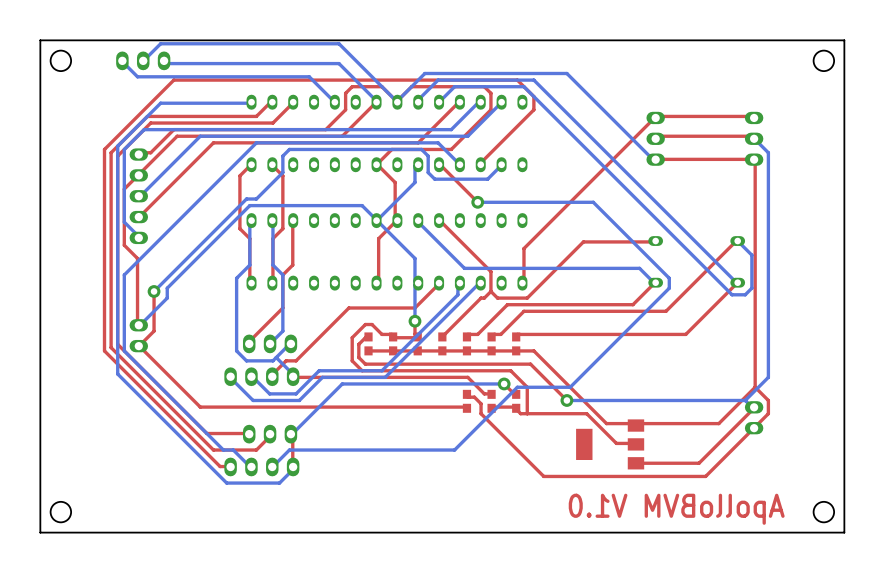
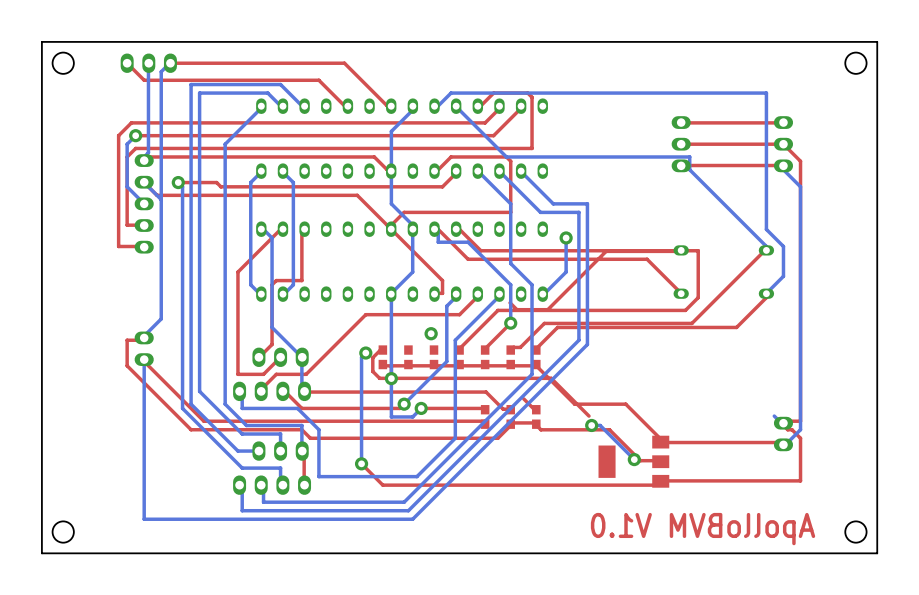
top track: none -> (127, 63) (144, 80) (318, 80) (344, 105) (347, 106)
bottom track: (122, 60) (137, 76) (309, 76) (334, 102) -> none
bottom track: (143, 60) (160, 43) (339, 43) (397, 102) (424, 73) (566, 73) (652, 159) (655, 159) -> (148, 63) (148, 152) (144, 156) (144, 160)
bottom track: (164, 60) (167, 63) (339, 63) (376, 102) -> none
bottom track: (251, 102) (160, 103) (117, 146) (117, 374) (226, 483) (279, 483) (292, 469) (293, 466) -> (261, 106) (225, 144) (225, 404) (246, 425) (301, 425) (302, 451)
top track: (272, 102) (256, 116) (147, 116) (111, 152) (111, 347) (213, 450) (256, 450) (270, 434) -> none
bottom track: none -> (282, 106) (267, 93) (199, 93) (199, 391) (242, 434) (280, 434) (280, 451)
top track: (293, 102) (272, 123) (150, 123) (117, 156) (117, 344) (206, 433) (249, 434) -> none
bottom track: none -> (304, 106) (301, 105) (280, 84) (191, 84) (191, 404) (237, 451) (258, 451)
top track: (376, 102) (342, 136) (177, 136) (124, 189) (124, 245) (137, 258) (138, 325) -> (391, 106) (387, 105) (344, 63) (170, 63)
bottom track: none -> (412, 106) (412, 110) (391, 131) (391, 203) (412, 225) (412, 229) (412, 272) (391, 294) (391, 416) (412, 416) (421, 408)
bottom track: (418, 102) (438, 80) (533, 80) (737, 282) -> (434, 106) (438, 105) (451, 93) (766, 93) (766, 229) (783, 246) (783, 276) (766, 293)
bottom track: (439, 102) (454, 86) (523, 86) (732, 294) (745, 294) (751, 288) (751, 255) (737, 241) -> (456, 106) (506, 156) (689, 156) (689, 169) (766, 246) (766, 250)
top track: (459, 102) (418, 142) (213, 142) (138, 217) -> (477, 106) (480, 105) (493, 93) (527, 93) (532, 97) (532, 148) (135, 148) (127, 156) (127, 225) (144, 225)
top track: none -> (499, 106) (485, 122) (131, 122) (118, 135) (118, 246) (144, 247)
bottom track: (480, 102) (451, 129) (144, 129) (124, 149) (124, 222) (138, 237) -> none
top track: none -> (521, 106) (493, 135) (135, 135)
bottom track: (501, 102) (467, 136) (200, 136) (138, 196) -> (135, 135) (127, 144) (127, 186) (144, 203)
top track: (754, 117) (656, 116) (523, 248) (522, 283) -> (783, 122) (681, 122)
via: none -> (135, 135)
top track: (754, 138) (751, 136) (656, 136) (655, 138) -> (361, 463) (382, 485) (659, 485) (660, 481) (664, 480) (800, 480) (800, 438) (792, 429) (787, 429) (783, 425) (783, 421) (800, 421) (800, 161) (783, 144) (681, 144)
bottom track: (754, 138) (768, 152) (768, 377) (745, 400) (566, 400) -> none
top track: (138, 154) (150, 152) (173, 129) (325, 129) (345, 109) (345, 93) (352, 86) (381, 86) (397, 102) (411, 86) (484, 86) (490, 93) (490, 109) (451, 149) (391, 149) (376, 164) (395, 182) (395, 218) (397, 220) (378, 238) (378, 281) (376, 283) -> (144, 160) (144, 156) (374, 156) (387, 169) (391, 171)
top track: (655, 159) (754, 159) (755, 387) -> (681, 165) (783, 165)
bottom track: none -> (783, 165) (783, 169) (800, 186) (800, 429) (783, 446) (783, 444)
top track: (251, 164) (239, 175) (239, 228) (249, 238) (249, 281) (251, 283) -> none
bottom track: none -> (261, 171) (250, 182) (250, 284) (261, 294)
top track: (272, 164) (282, 175) (282, 228) (272, 238) (272, 283) -> none
bottom track: none -> (282, 171) (293, 182) (293, 284) (282, 294)
top track: none -> (434, 171) (451, 156) (506, 156) (510, 161) (510, 212) (404, 212) (391, 225) (391, 229)
bottom track: (418, 164) (414, 165) (414, 182) (376, 220) -> none
top track: (439, 164) (477, 202) -> (456, 171) (442, 186) (220, 186) (216, 182) (178, 182)
bottom track: (459, 164) (438, 142) (256, 142) (124, 274) (124, 350) (223, 450) (233, 450) (251, 466) -> (477, 171) (510, 203) (510, 263) (532, 284) (532, 374) (404, 502) (263, 502) (263, 485) (261, 485)
top track: (480, 164) (533, 109) (533, 96) (517, 80) (173, 80) (104, 149) (104, 350) (220, 466) (230, 466) -> none
bottom track: none -> (499, 171) (540, 212) (578, 212) (578, 340) (408, 510) (242, 510) (242, 485) (239, 485)
bottom track: (501, 164) (487, 179) (434, 179) (428, 172) (428, 156) (421, 149) (289, 149) (282, 156) (282, 172) (256, 199) (246, 199) (154, 291) -> (521, 171) (553, 203) (587, 203) (587, 344) (412, 519) (144, 519) (144, 359)
top track: none -> (144, 182) (156, 195) (357, 195) (391, 229)
bottom track: none -> (144, 182) (161, 199)
via: none -> (178, 182)
bottom track: (477, 202) (593, 202) (669, 278) (669, 288) (570, 387) (517, 387) (454, 450) (289, 450) (272, 466) -> (178, 182) (182, 186) (182, 408) (242, 468) (280, 468) (280, 485) (282, 485)
via: (477, 202) -> none
bottom track: (251, 220) (249, 222) (249, 265) (236, 278) (236, 350) (246, 360) (272, 360) (290, 343) -> (261, 229) (272, 237) (272, 327) (301, 357) (301, 391) (304, 391)
top track: none -> (282, 229) (237, 272) (237, 374) (263, 374) (280, 357)
bottom track: (272, 220) (272, 265) (282, 274) (282, 331) (270, 343) -> none
top track: (293, 220) (292, 265) (282, 274) (282, 308) (249, 341) (249, 343) -> (304, 229) (301, 229) (301, 280) (276, 280) (272, 284) (272, 344) (258, 357)
top track: none -> (391, 229) (442, 280) (442, 293) (434, 294)
bottom track: (376, 220) (362, 205) (249, 205) (167, 288) (167, 298) (138, 325) -> (170, 63) (161, 71) (161, 318) (144, 337)
bottom track: (376, 220) (414, 258) (414, 281) (418, 283) (414, 284) (414, 321) -> none
bottom track: (418, 220) (464, 268) (639, 268) (655, 282) -> (434, 229) (438, 229) (438, 242) (468, 242) (510, 284) (510, 323)
top track: (439, 220) (490, 271) (490, 291) (484, 298) (481, 298) (442, 336) -> (456, 229) (459, 229) (480, 250) (698, 250) (698, 297) (685, 310) (497, 310) (459, 350)
bottom track: none -> (566, 237) (566, 272) (542, 294)
via: none -> (566, 237)
top track: (655, 282) (632, 304) (507, 304) (477, 334) (467, 334) (466, 336) -> (681, 293) (647, 259) (468, 259) (438, 229) (434, 229)
top track: (737, 282) (685, 334) (517, 334) (516, 336) -> (766, 293) (766, 297) (736, 327) (557, 327) (536, 350)
top track: (439, 283) (414, 308) (348, 308) (296, 360) (286, 360) (272, 376) -> (404, 404) (399, 408) (301, 408) (282, 391)
bottom track: none -> (456, 294) (446, 306) (446, 361) (404, 404)
top track: none -> (477, 294) (459, 314) (365, 314) (306, 374) (276, 374) (259, 391) (261, 391)
bottom track: (459, 283) (457, 284) (457, 294) (381, 370) (319, 370) (296, 393) (269, 393) (251, 376) -> none
bottom track: (480, 283) (385, 377) (322, 377) (299, 400) (253, 400) (230, 376) -> (499, 294) (455, 340) (455, 438) (416, 476) (318, 476) (318, 429) (297, 408) (242, 408) (242, 391) (239, 391)
top track: (154, 291) (154, 331) (138, 346) (200, 407) (466, 408) -> (144, 359) (203, 421) (485, 421) (485, 424)
via: (154, 291) -> none
top track: none -> (510, 323) (485, 350)
via: none -> (510, 323)
top track: (414, 321) (414, 334) (417, 336) (414, 337) (395, 337) (391, 334) (381, 334) (372, 324) (365, 324) (352, 337) (352, 360) (362, 370) (510, 370) (527, 387) (527, 413) -> none
top track: none -> (144, 337) (144, 340) (127, 340) (127, 365) (191, 429) (301, 429) (310, 438) (497, 438) (510, 425)
bottom track: none -> (365, 353) (361, 357) (361, 463)
via: none -> (365, 353)
top track: (368, 350) (533, 350) (606, 423) (632, 423) (635, 425) (636, 423) (718, 423) (755, 387) -> (382, 364) (536, 365) (574, 404) (625, 404) (659, 438) (660, 442) (783, 442) (783, 444)
bottom track: (276, 357) (293, 376) -> none
via: none -> (391, 378)
bottom track: (504, 383) (342, 383) (290, 434) -> none
via: (504, 383) -> none
top track: (755, 387) (768, 400) (768, 413) (705, 476) (543, 476) (481, 413) (481, 403) (474, 397) (467, 397) (466, 394) -> (421, 408) (485, 409)
via: none -> (404, 404)
via: none -> (421, 408)
via: (566, 400) -> none
top track: (754, 407) (699, 463) (635, 463) -> none
bottom track: none -> (591, 425) (600, 425) (634, 459)
via: none -> (591, 425)
via: none -> (634, 459)
via: none -> (361, 463)

